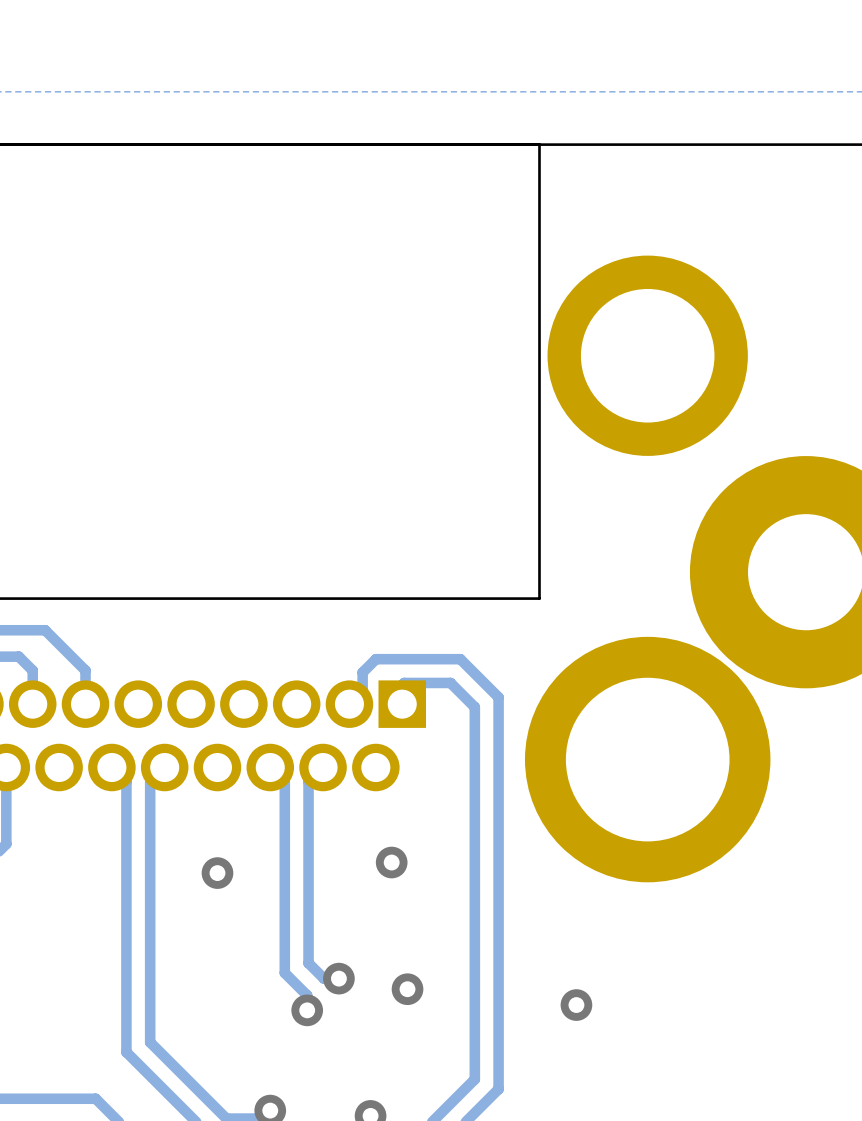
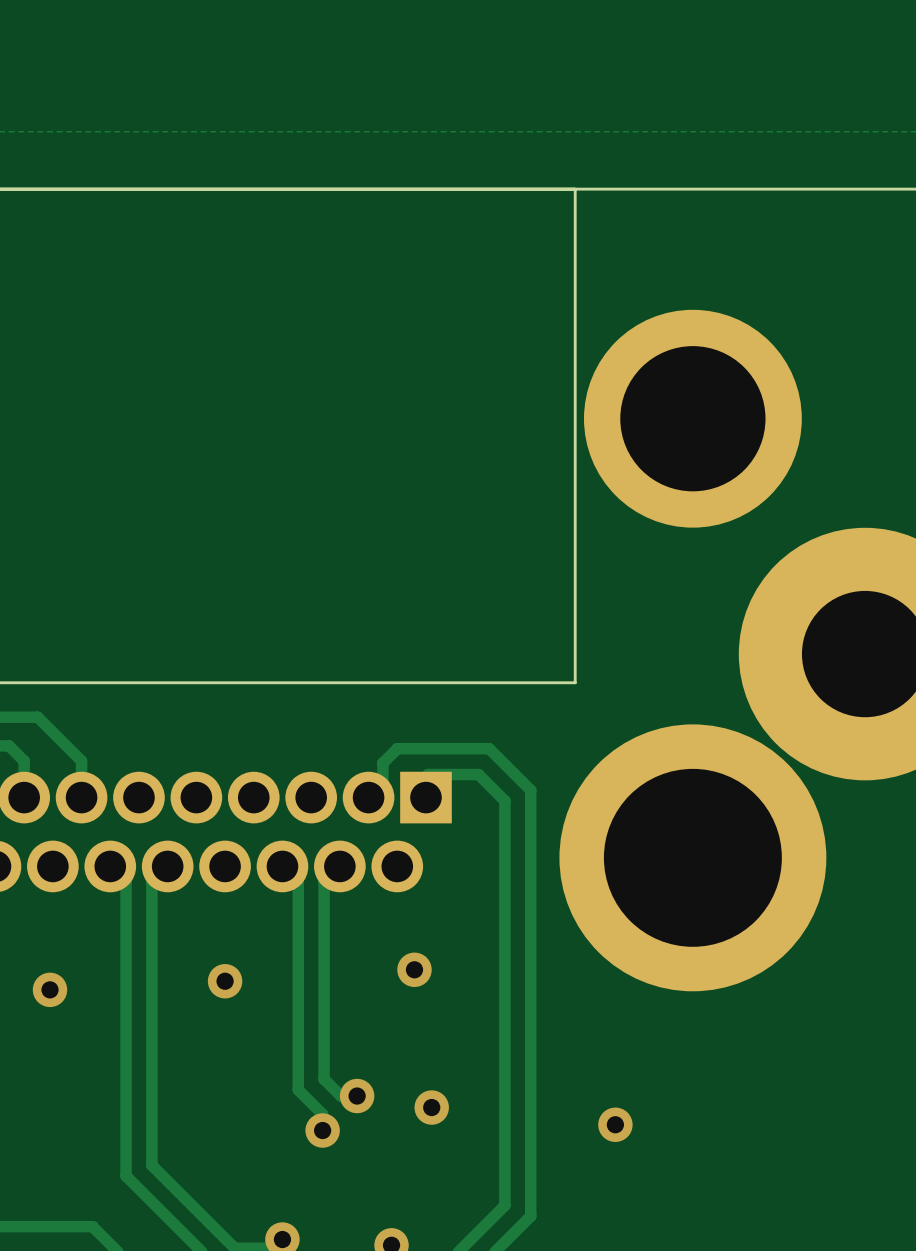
via: none -> (50, 989)

